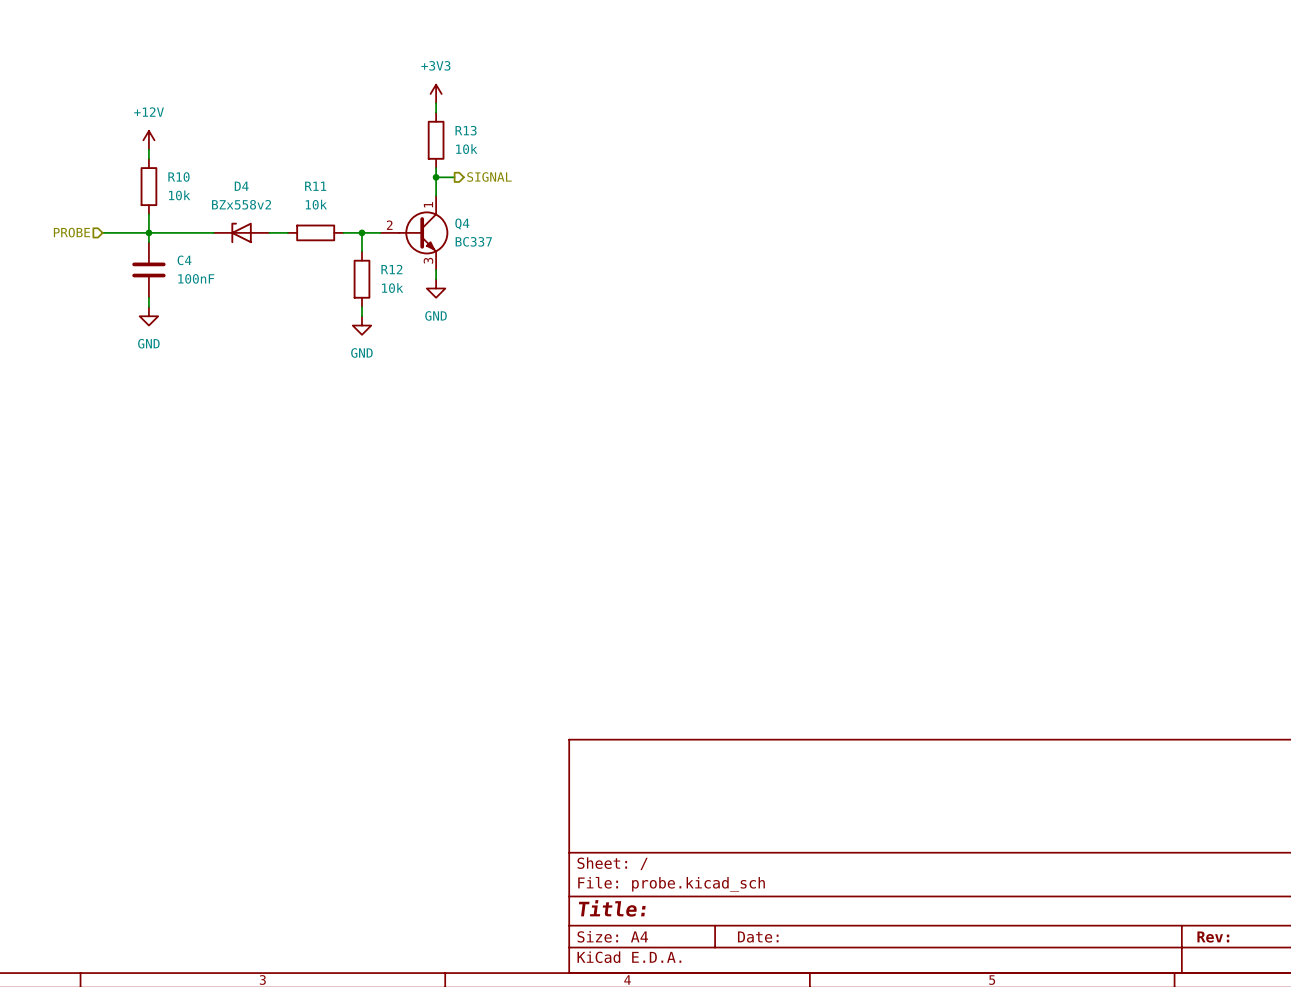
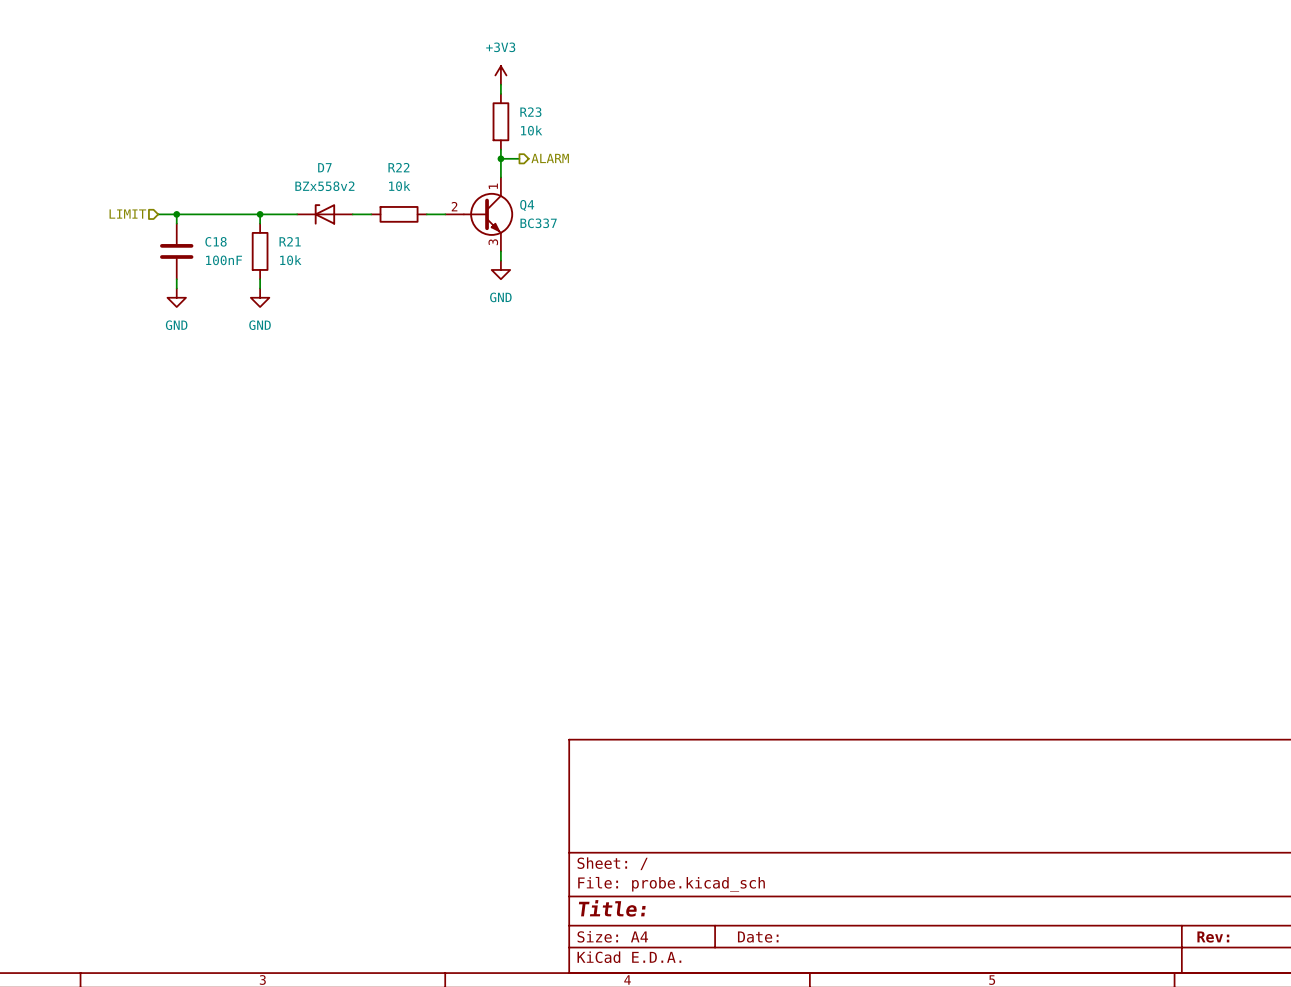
power symbol position: +3V3 (436, 93) -> +3V3 (500, 75)
wire: (436, 103) (436, 112) -> (500, 84) (500, 93)
R23: none -> 10k (500, 121)
power symbol: +12V (148, 140) -> none
R13: 10k (436, 140) -> none
wire: (148, 149) (148, 158) -> (176, 214) (176, 223)
junction: none -> (500, 158)
hierarchical label: none -> ALARM (550, 158)
wire: (436, 168) (436, 195) -> (500, 149) (500, 177)
wire: (436, 177) (454, 177) -> (500, 158) (519, 158)
junction: (436, 177) -> none
hierarchical label: SIGNAL (489, 177) -> none
R10: 10k (148, 186) -> none
hierarchical label: none -> LIMIT (127, 214)
wire: (148, 214) (148, 242) -> none
wire: none -> (158, 214) (297, 214)
wire: none -> (260, 214) (260, 223)
junction: none -> (260, 214)
D7: none -> BZx558v2 (324, 214)
R22: none -> 10k (399, 214)
wire: none -> (426, 214) (445, 214)
hierarchical label: PROBE (71, 232) -> none
wire: (102, 232) (213, 232) -> none
junction position: (148, 232) -> (176, 214)
D4: BZx558v2 (241, 232) -> none
wire: (269, 232) (287, 232) -> (352, 214) (371, 214)
R11: 10k (315, 232) -> none
wire: (343, 232) (380, 232) -> none
wire: (361, 232) (361, 251) -> none
junction: (361, 232) -> none
Q4 position: (414, 232) -> (479, 214)
C18: none -> 100nF (176, 251)
R21: none -> 10k (260, 251)
C4: 100nF (148, 269) -> none
wire: (436, 269) (436, 279) -> (500, 251) (500, 260)
R12: 10k (361, 279) -> none
power symbol position: GND (436, 288) -> GND (500, 269)
wire: (148, 297) (148, 307) -> (176, 279) (176, 288)
power symbol: none -> GND (260, 297)
wire: (361, 307) (361, 316) -> (260, 279) (260, 288)
power symbol position: GND (148, 316) -> GND (176, 297)
power symbol: GND (361, 325) -> none

